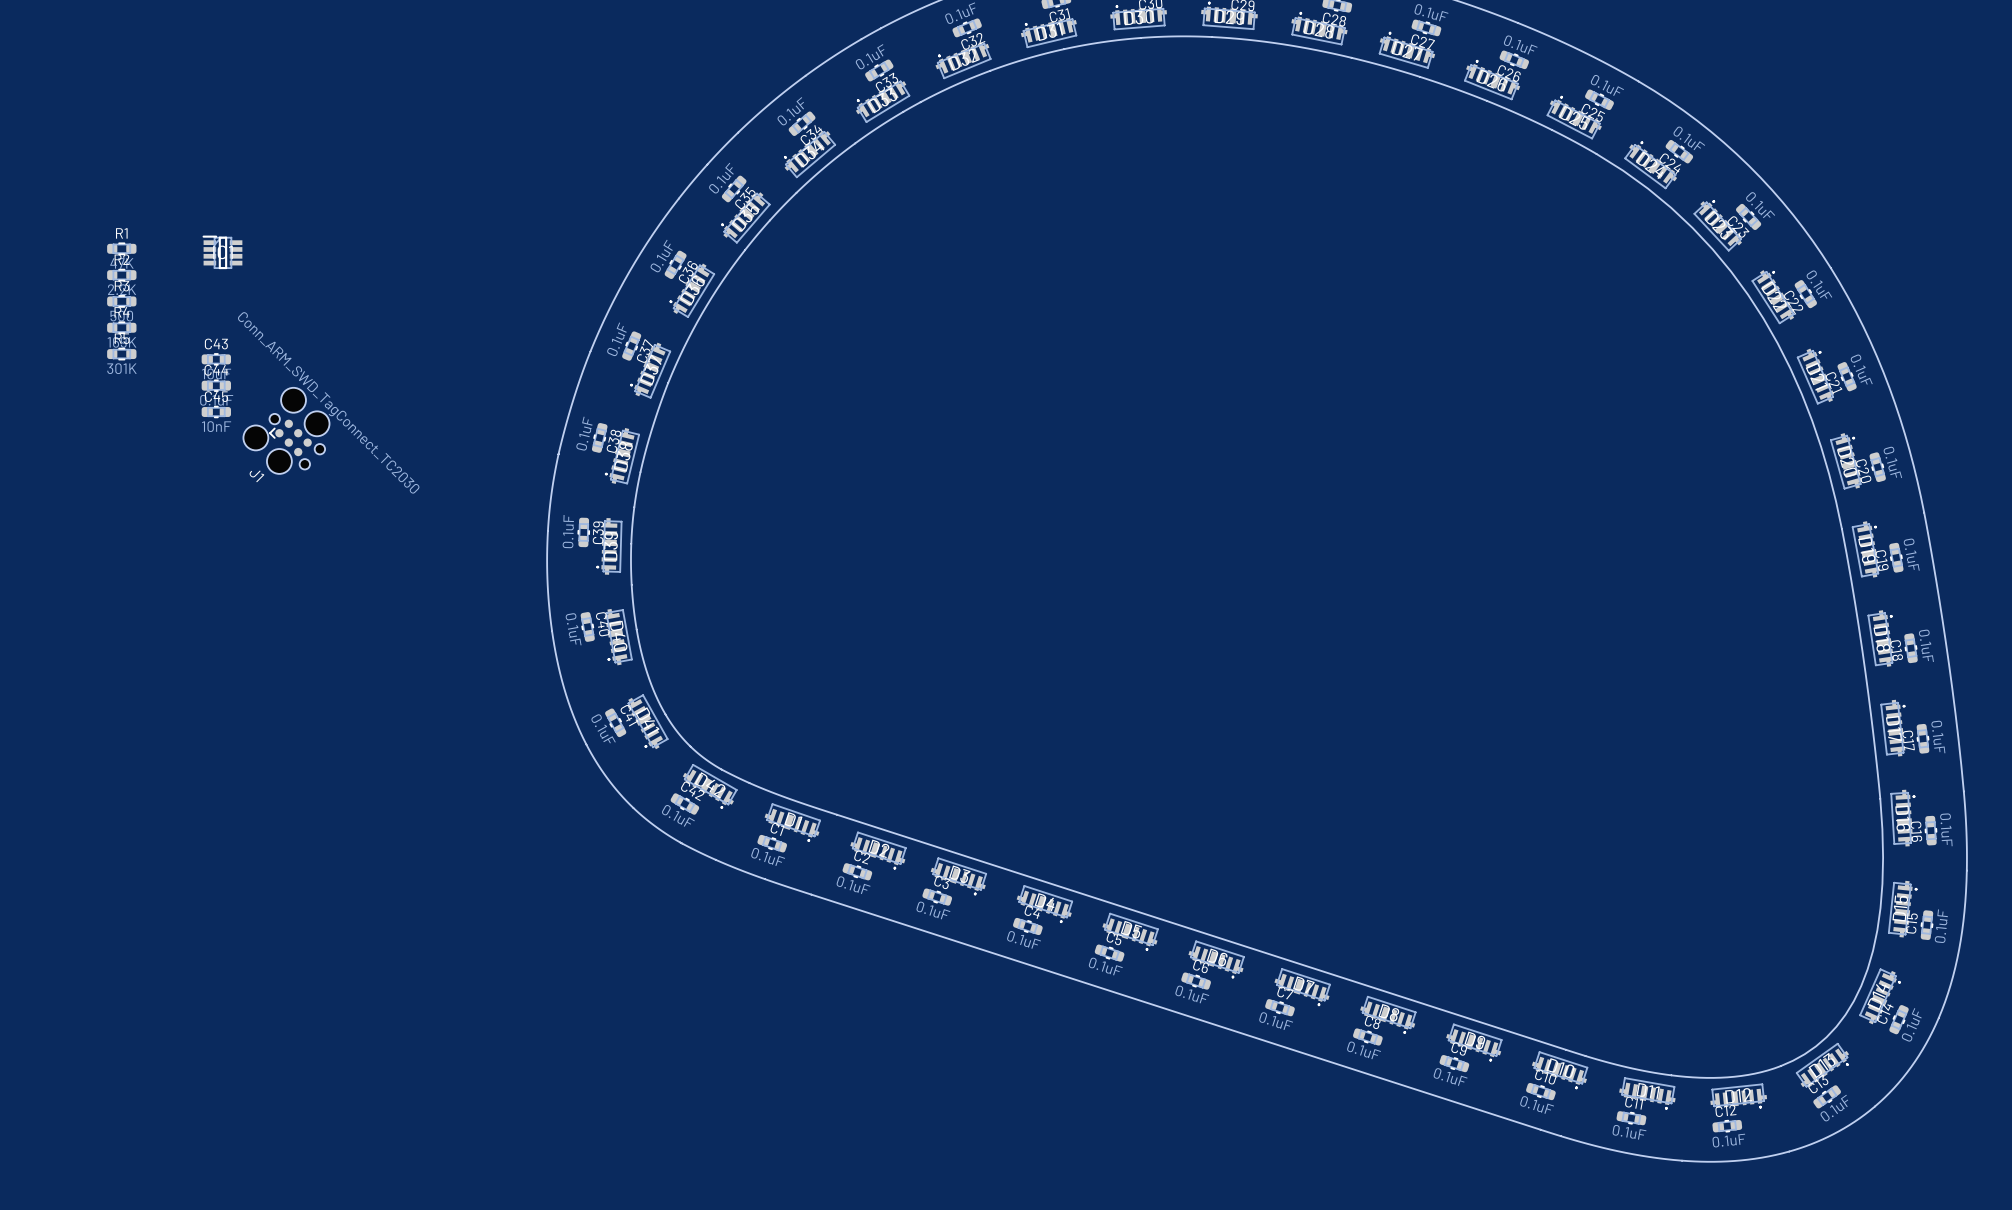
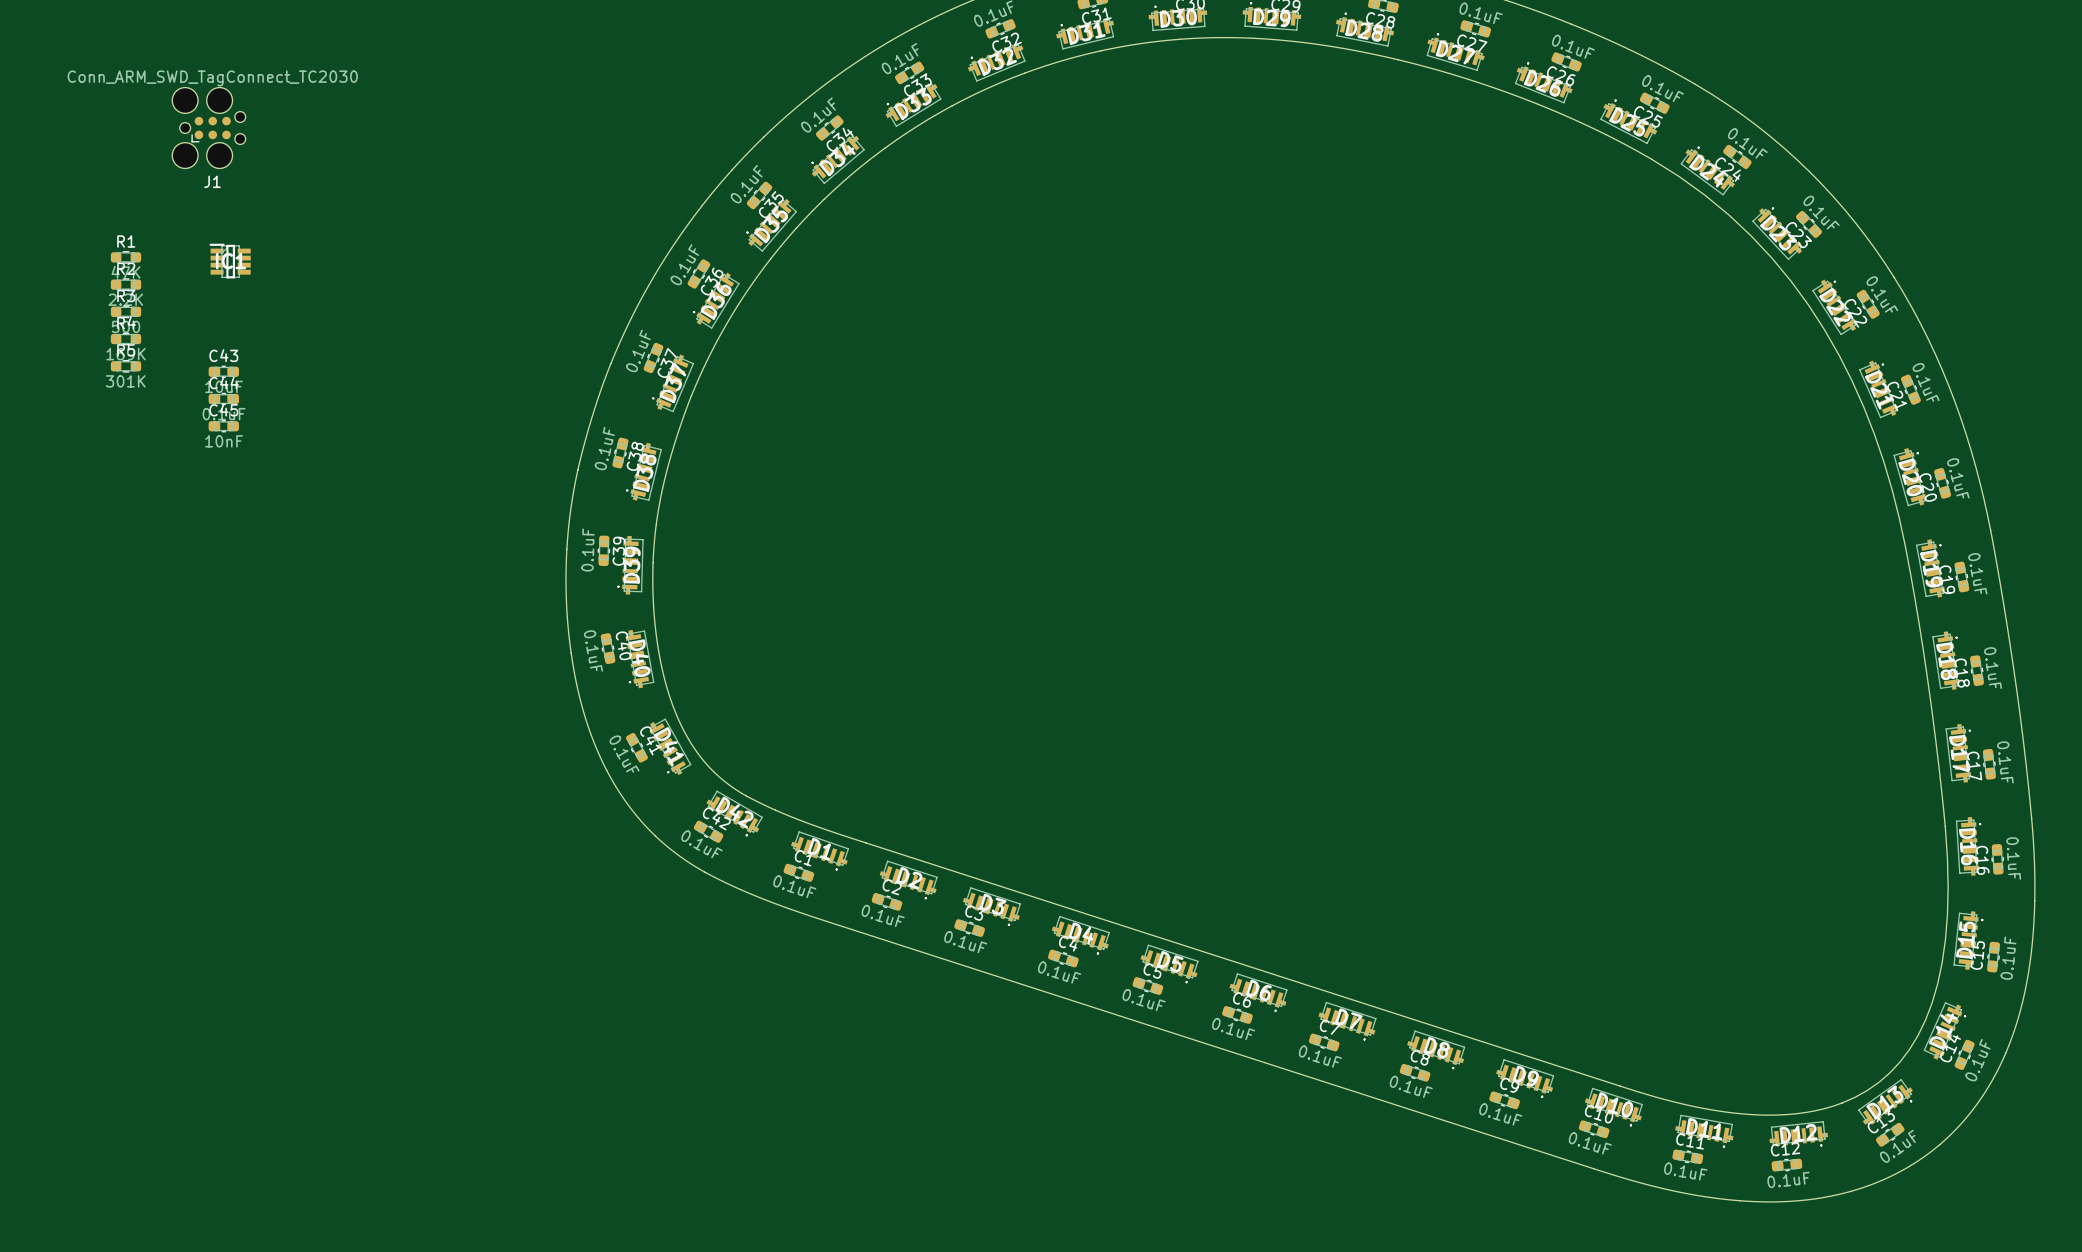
J1 rotation: 0° (286, 430) -> 45° counterclockwise (208, 128)
J1 position: (286, 430) -> (208, 128)

